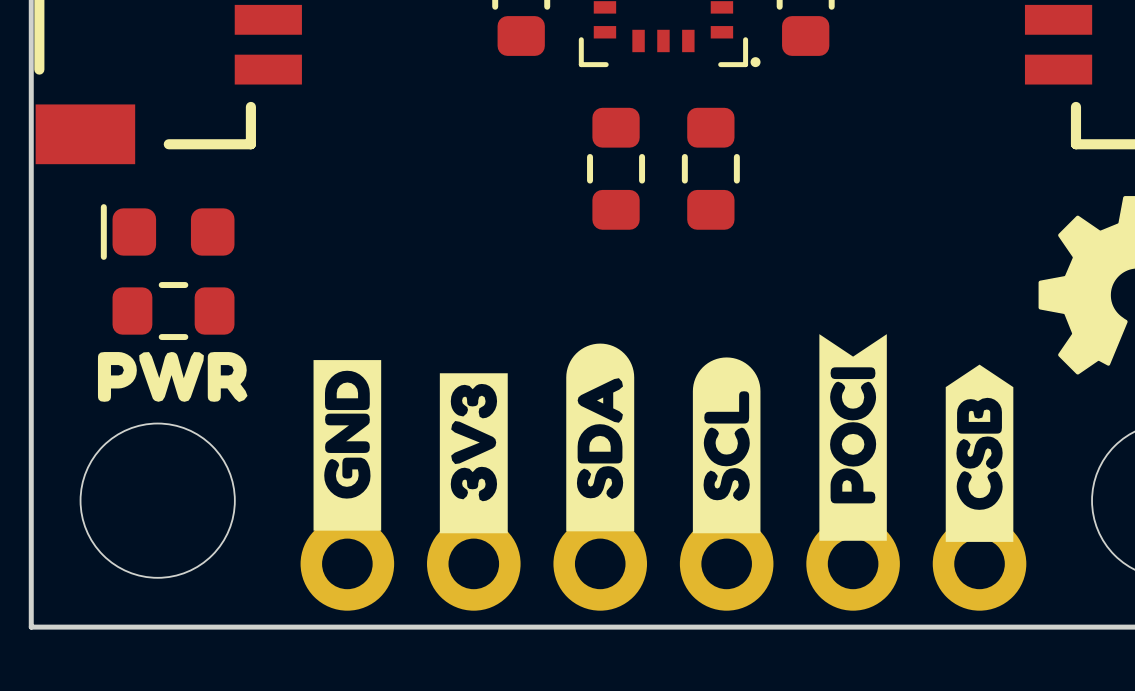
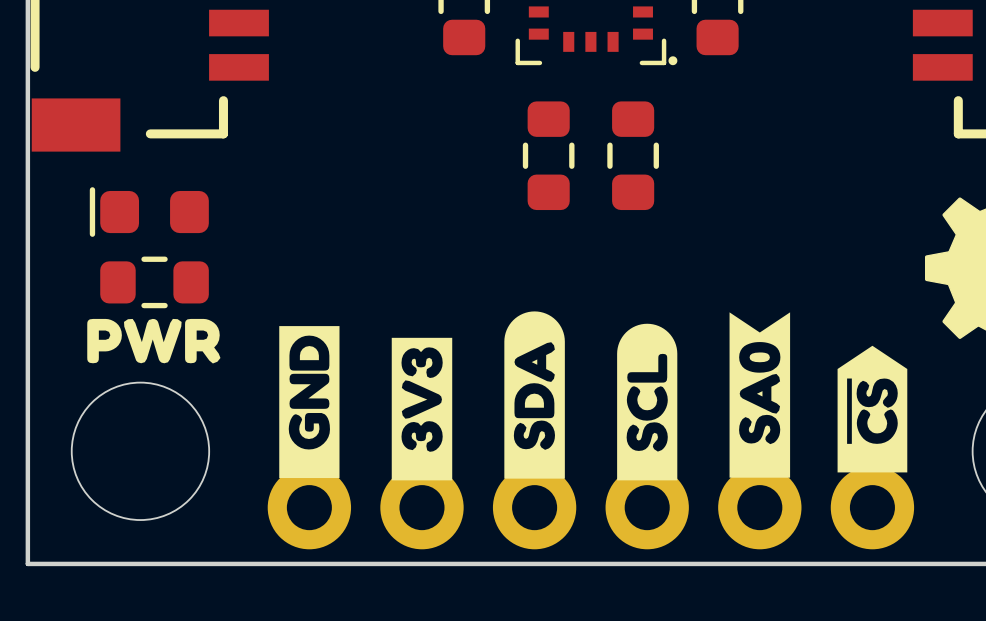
drawing shape: [819, 334, 887, 541] -> [729, 312, 791, 478]
drawing shape: [945, 364, 1014, 542] -> [837, 345, 908, 473]

